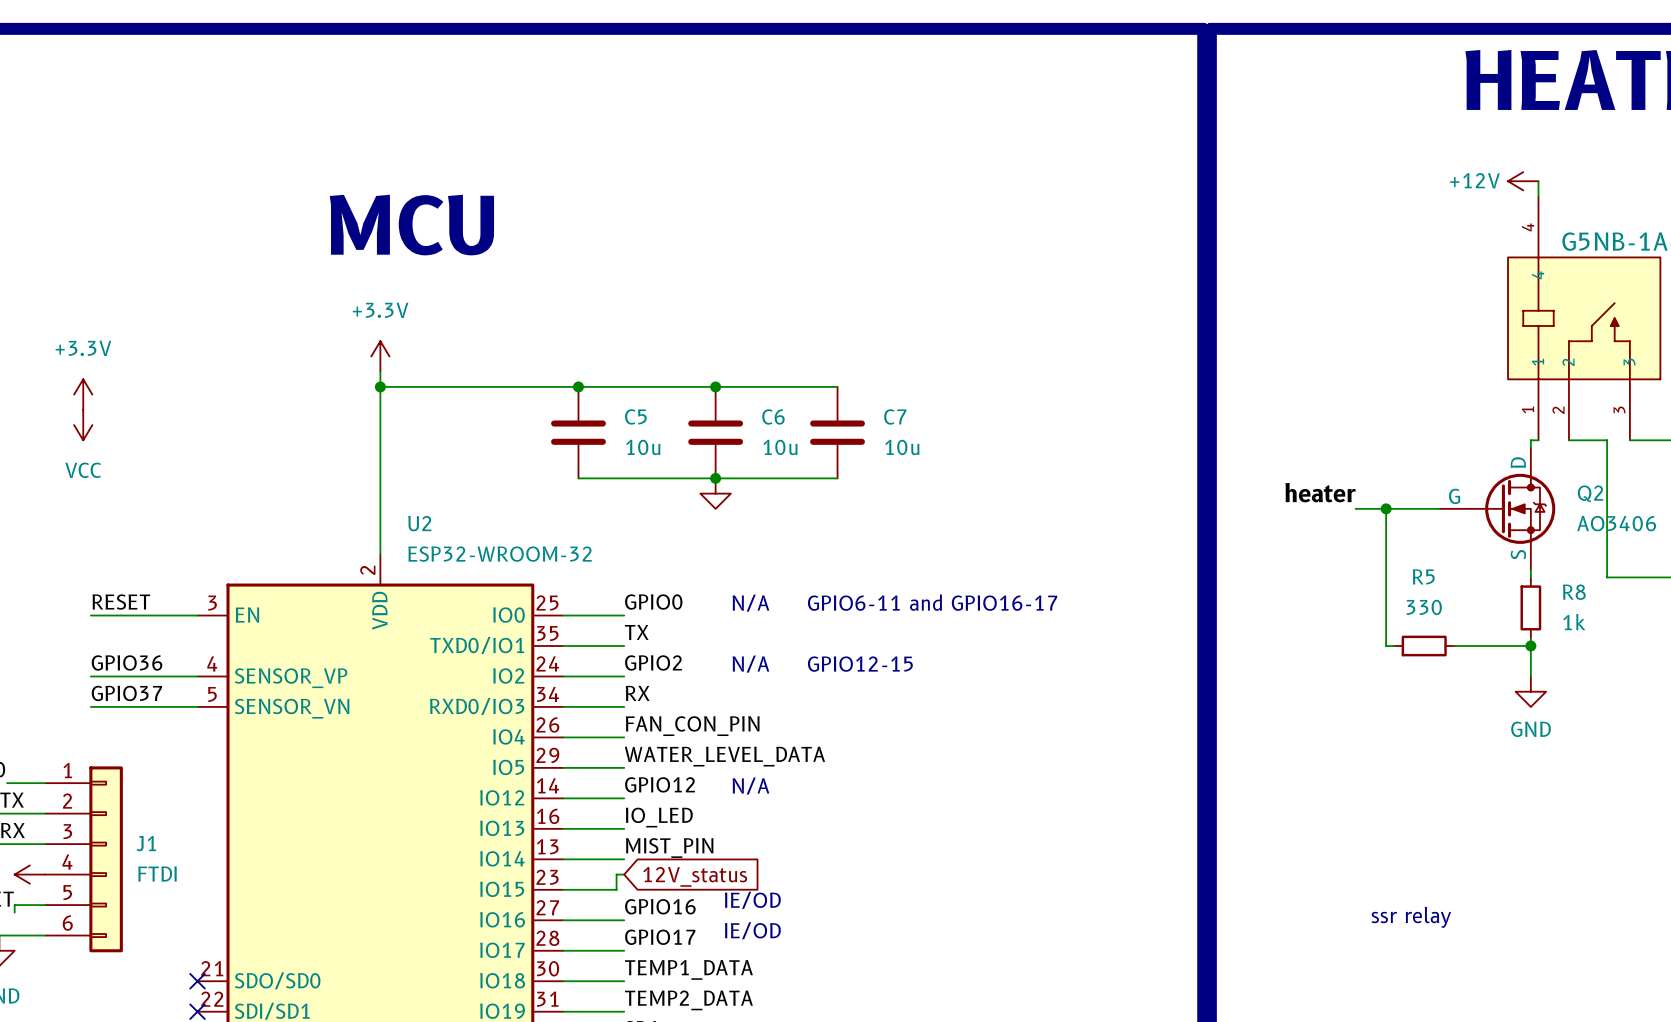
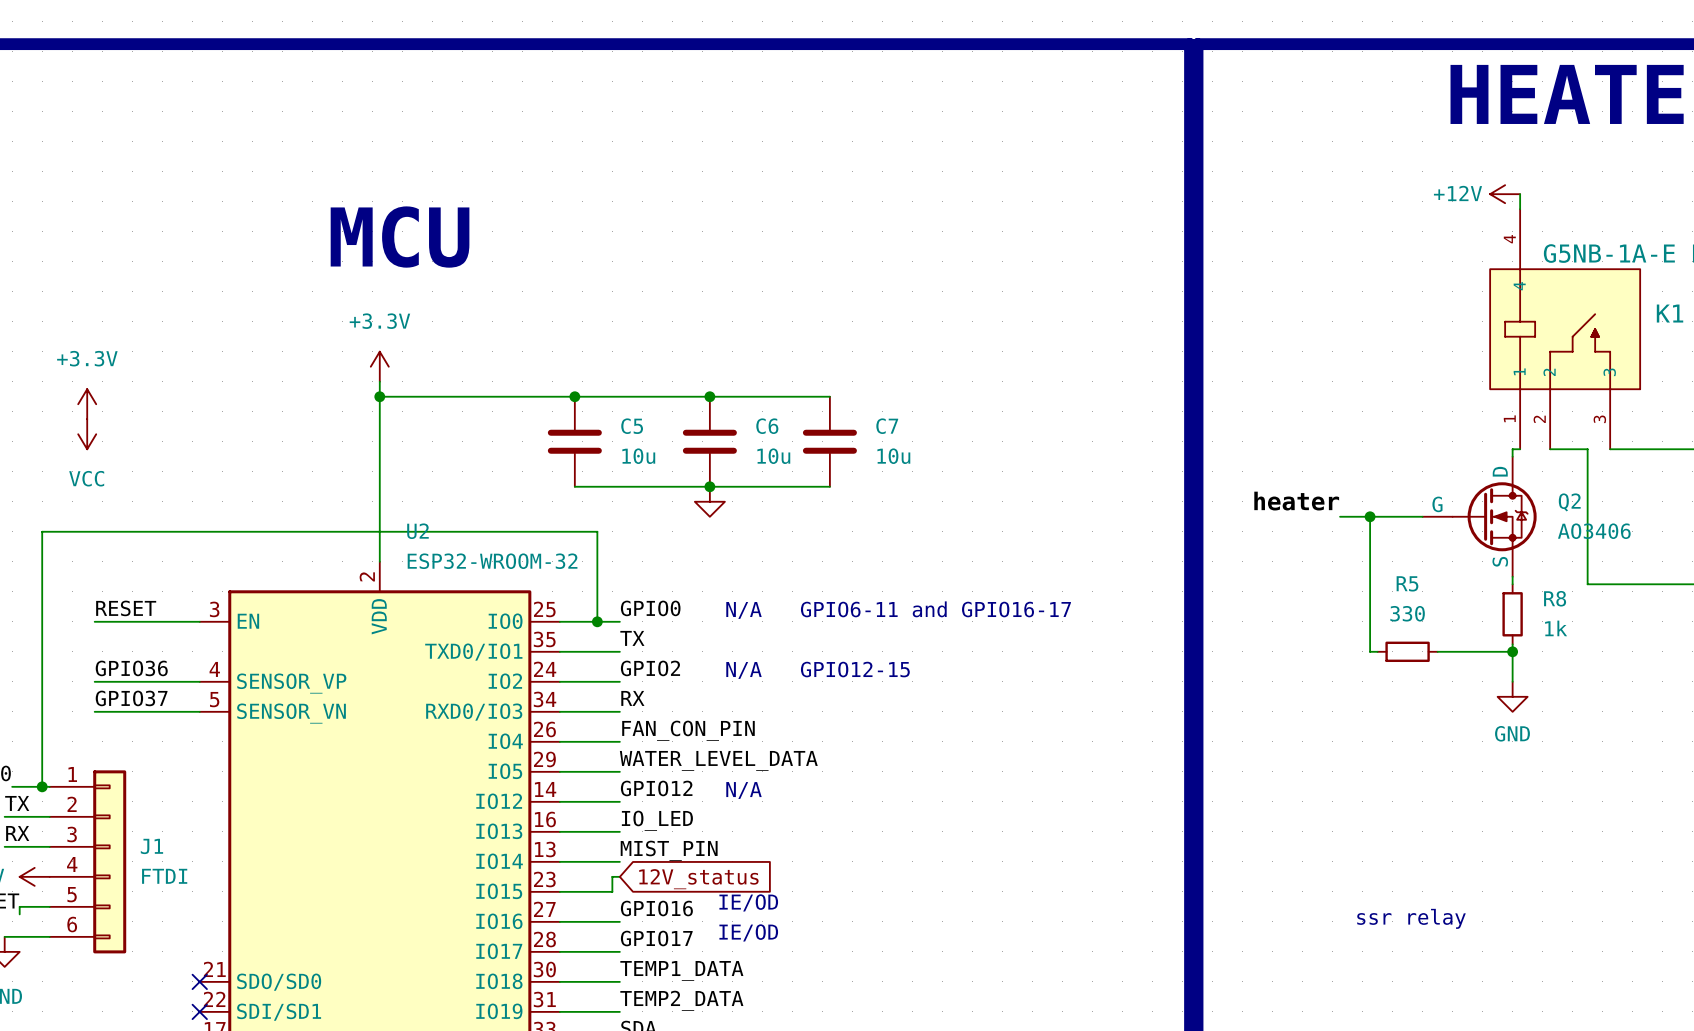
wire: none -> (597, 621) (597, 531) (42, 531) (42, 786)
junction: none -> (597, 621)
junction: none -> (42, 786)

